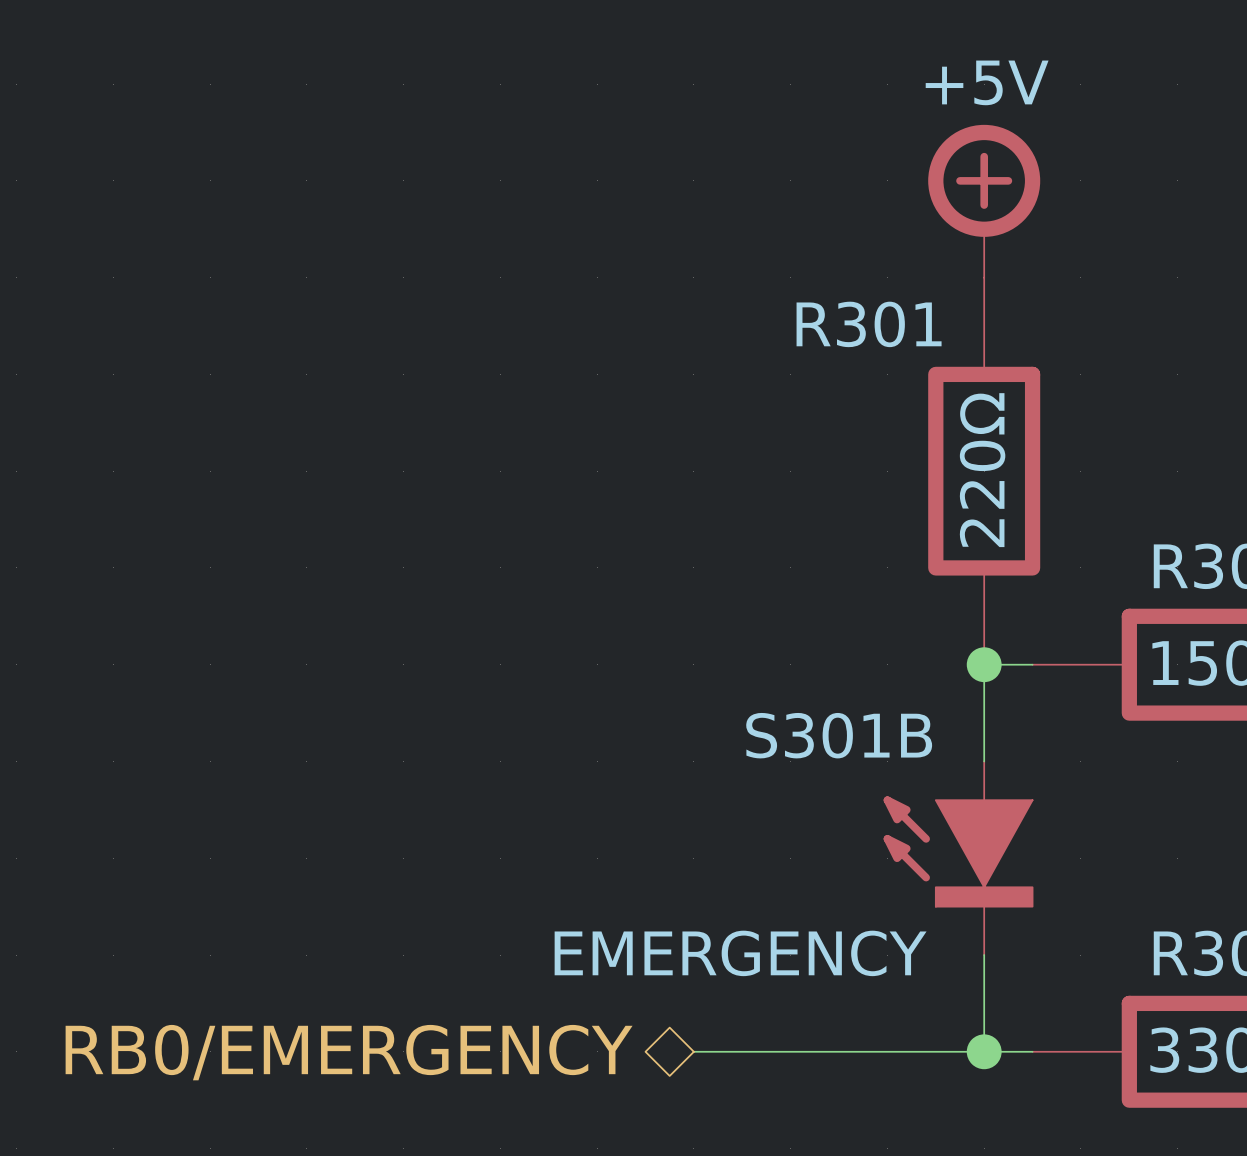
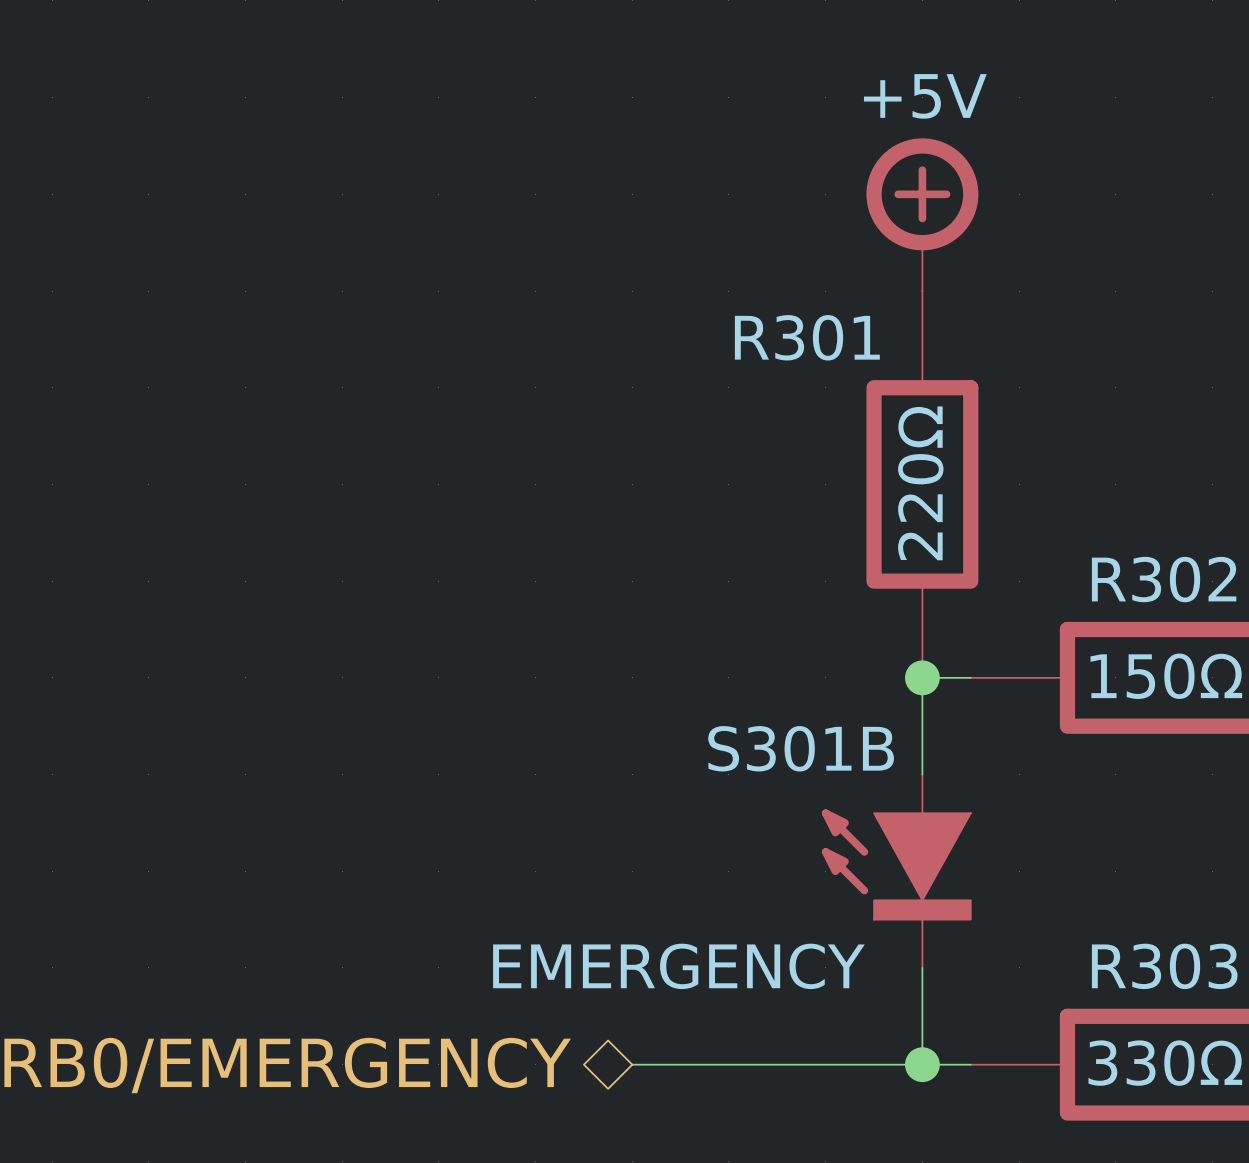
S301B name position: S301B (839, 735) -> S301B (801, 748)

